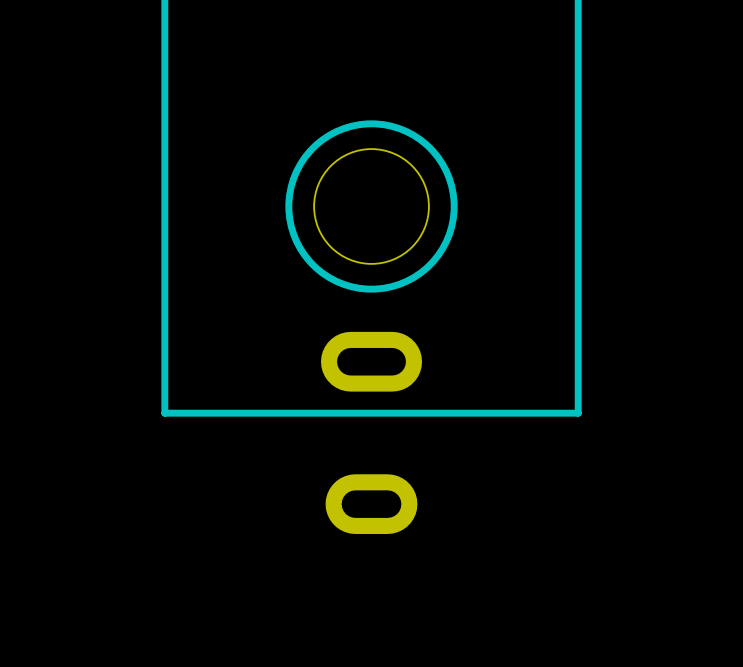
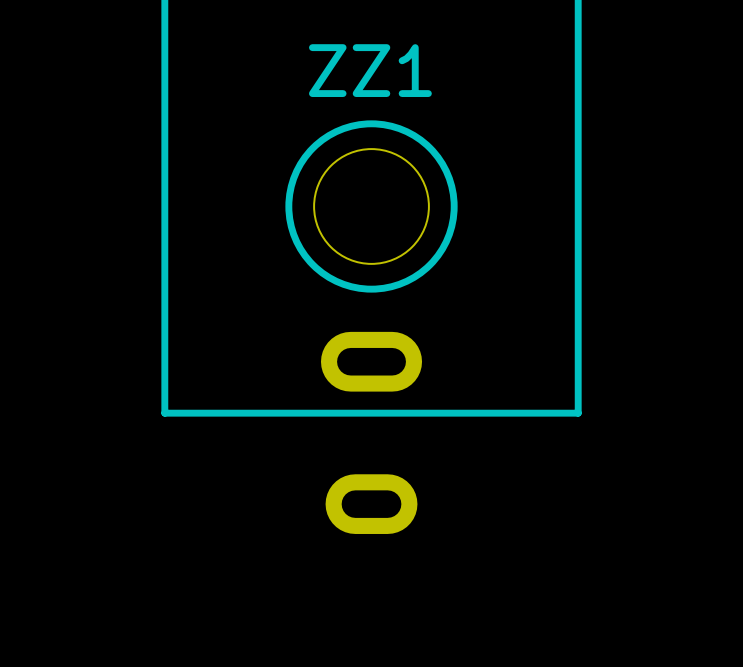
ZZ1 name: none -> ZZ1 (370, 70)

